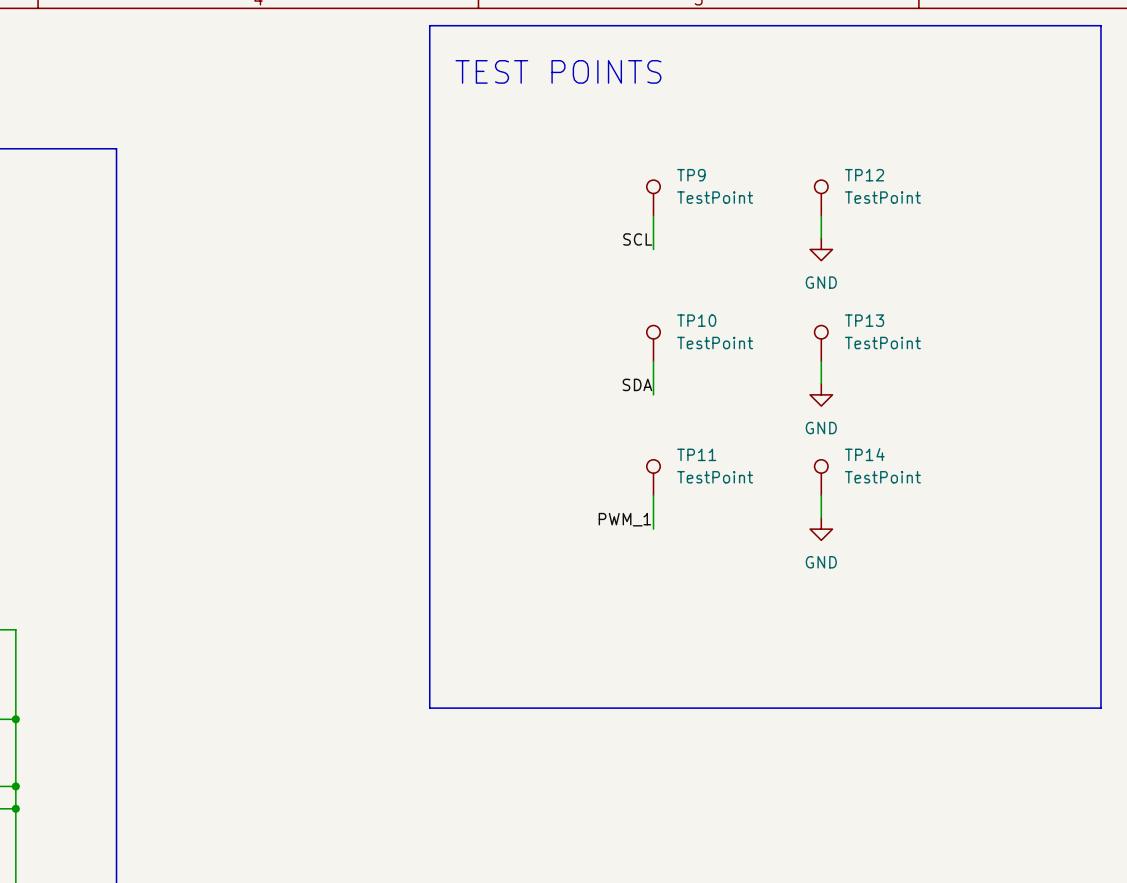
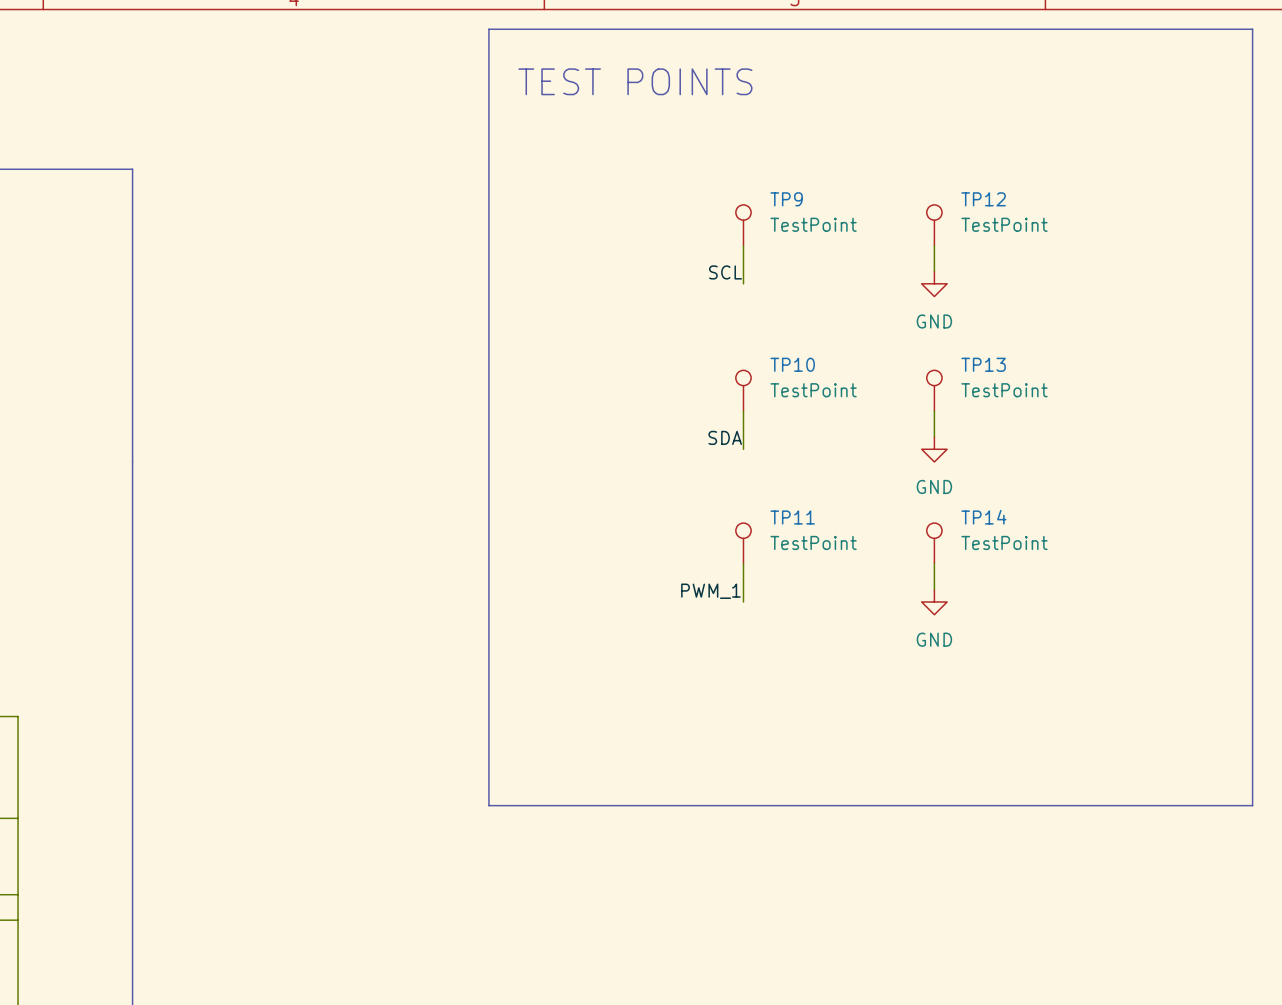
junction: (15, 719) -> none
junction: (15, 786) -> none
junction: (15, 808) -> none

